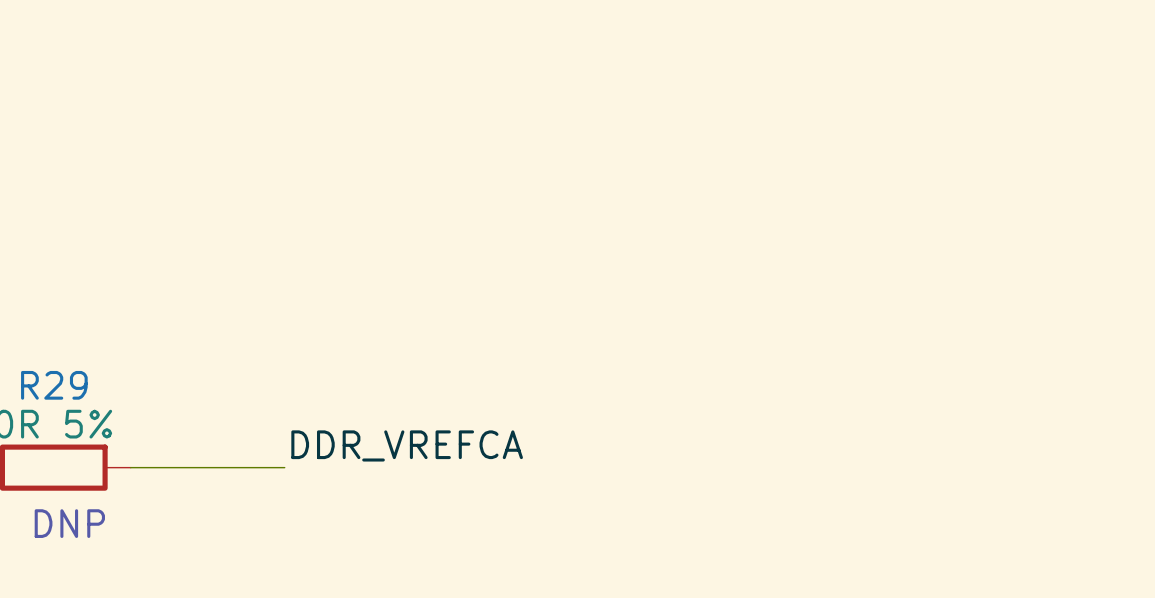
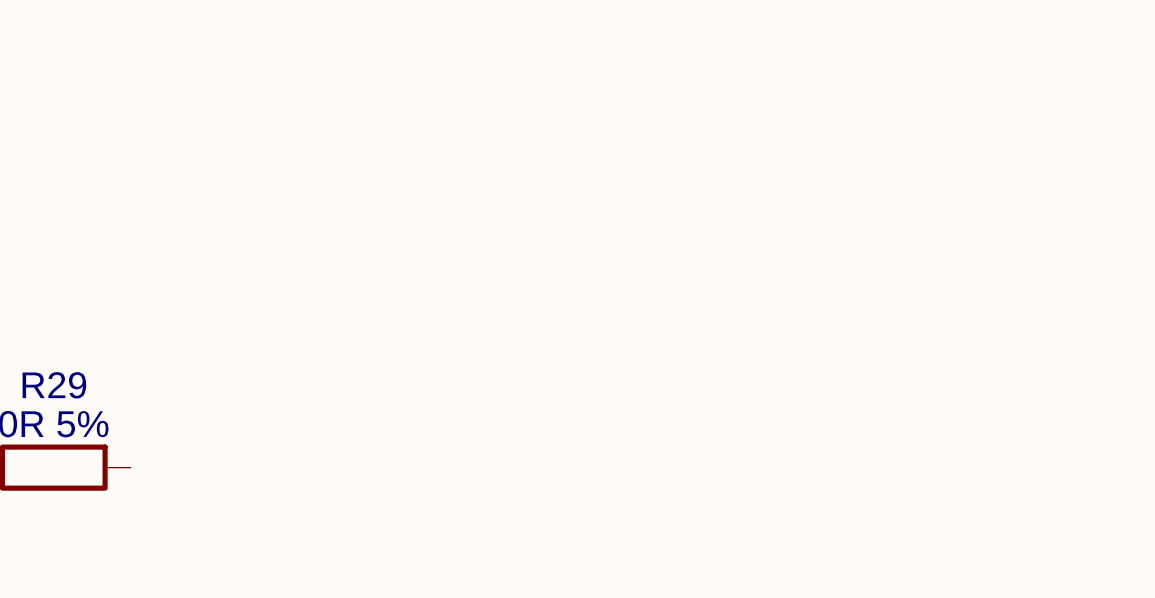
label: DDR_VREFCA (407, 445) -> none
wire: (130, 467) (284, 467) -> none
text: DNP (69, 523) -> none

